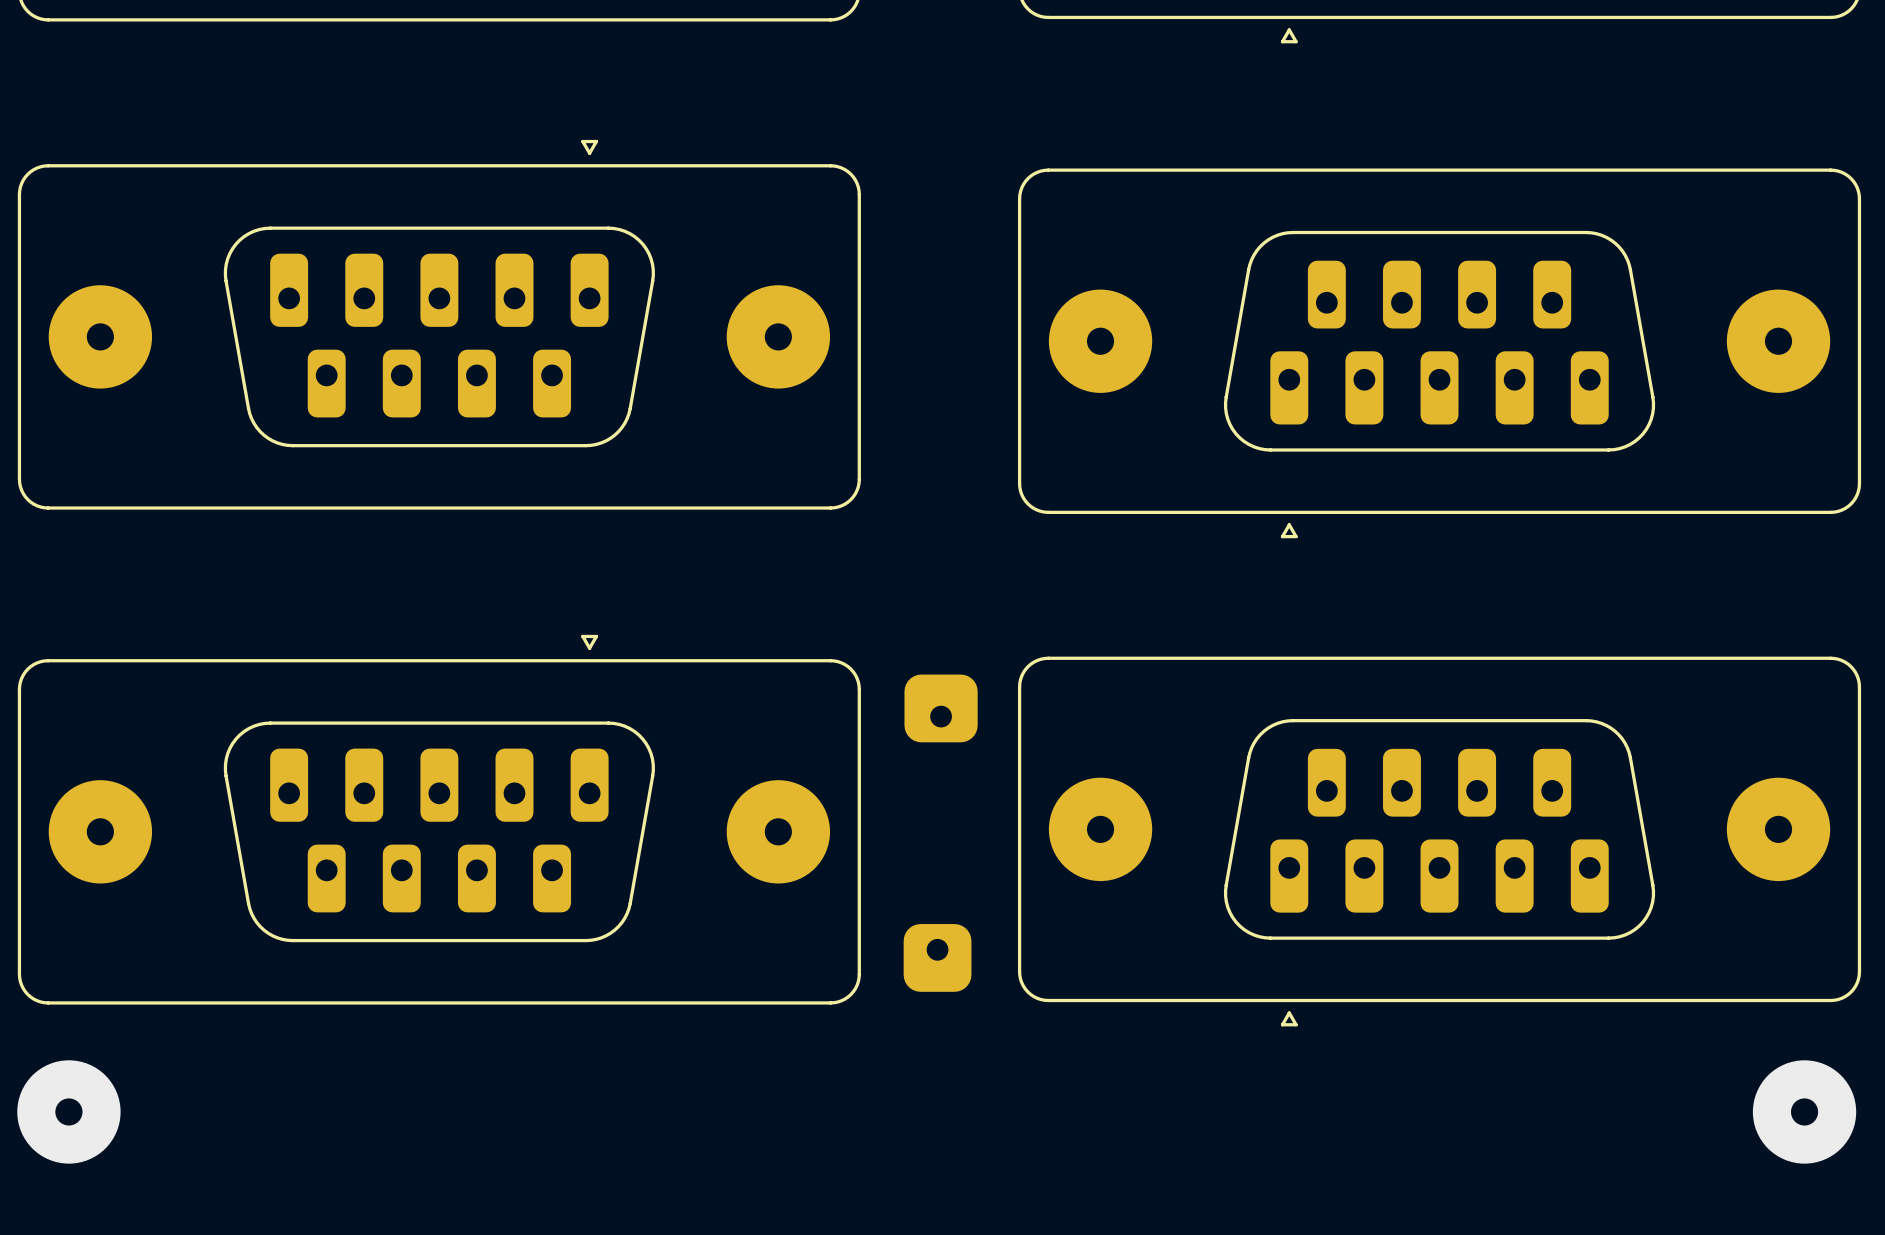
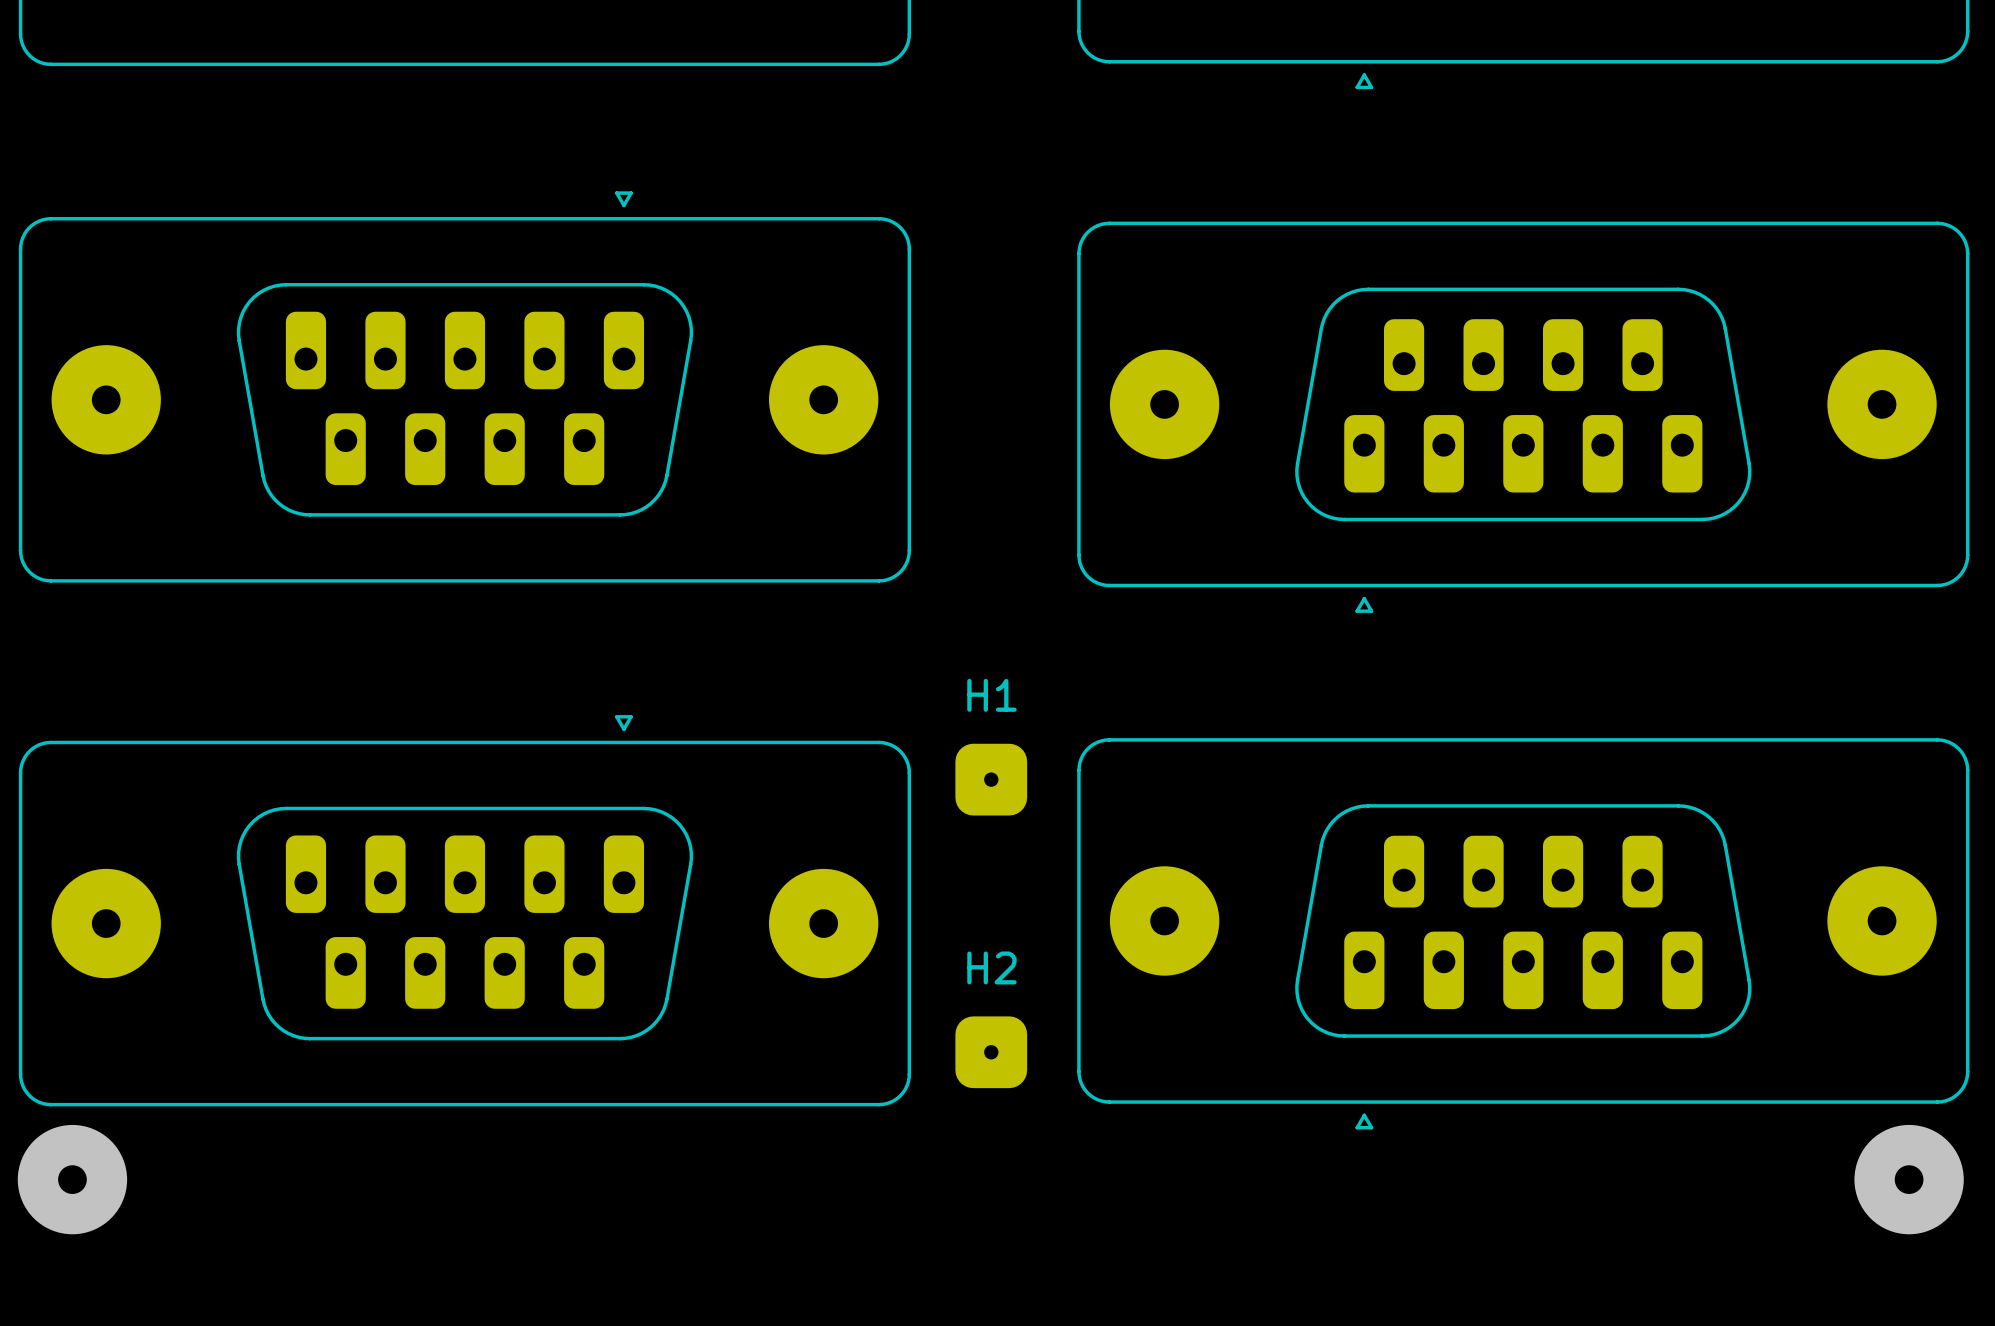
H1: none -> (991, 779)
part: (941, 708) -> none
H2: none -> (991, 1052)
part: (937, 957) -> none
via position: (68, 1111) -> (72, 1179)
via position: (1804, 1111) -> (1909, 1179)

